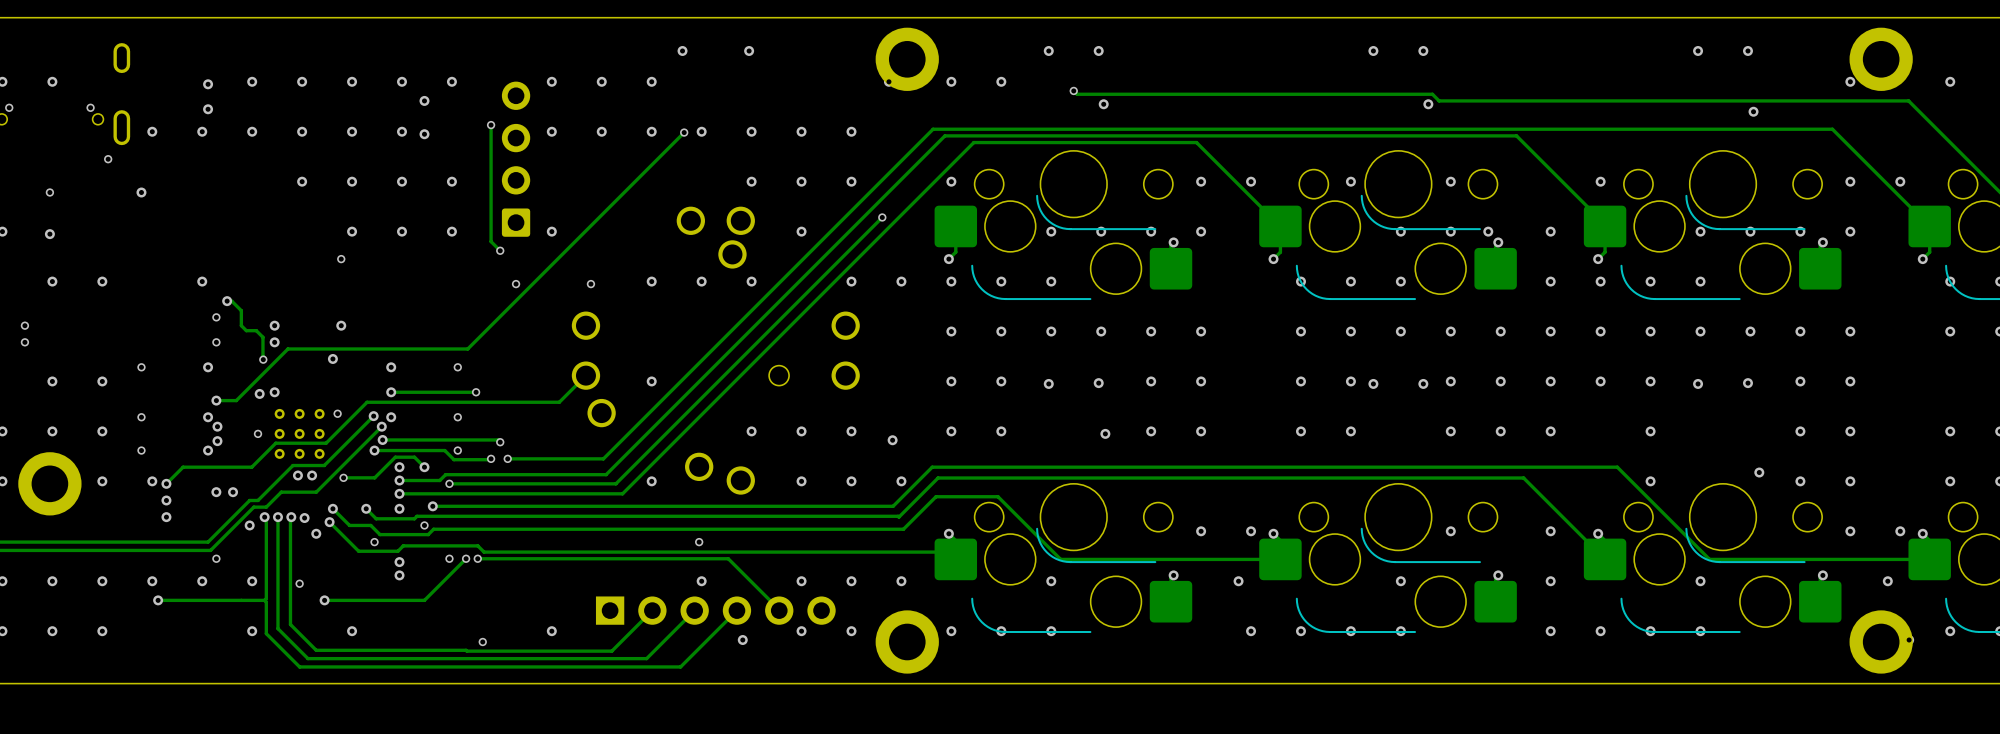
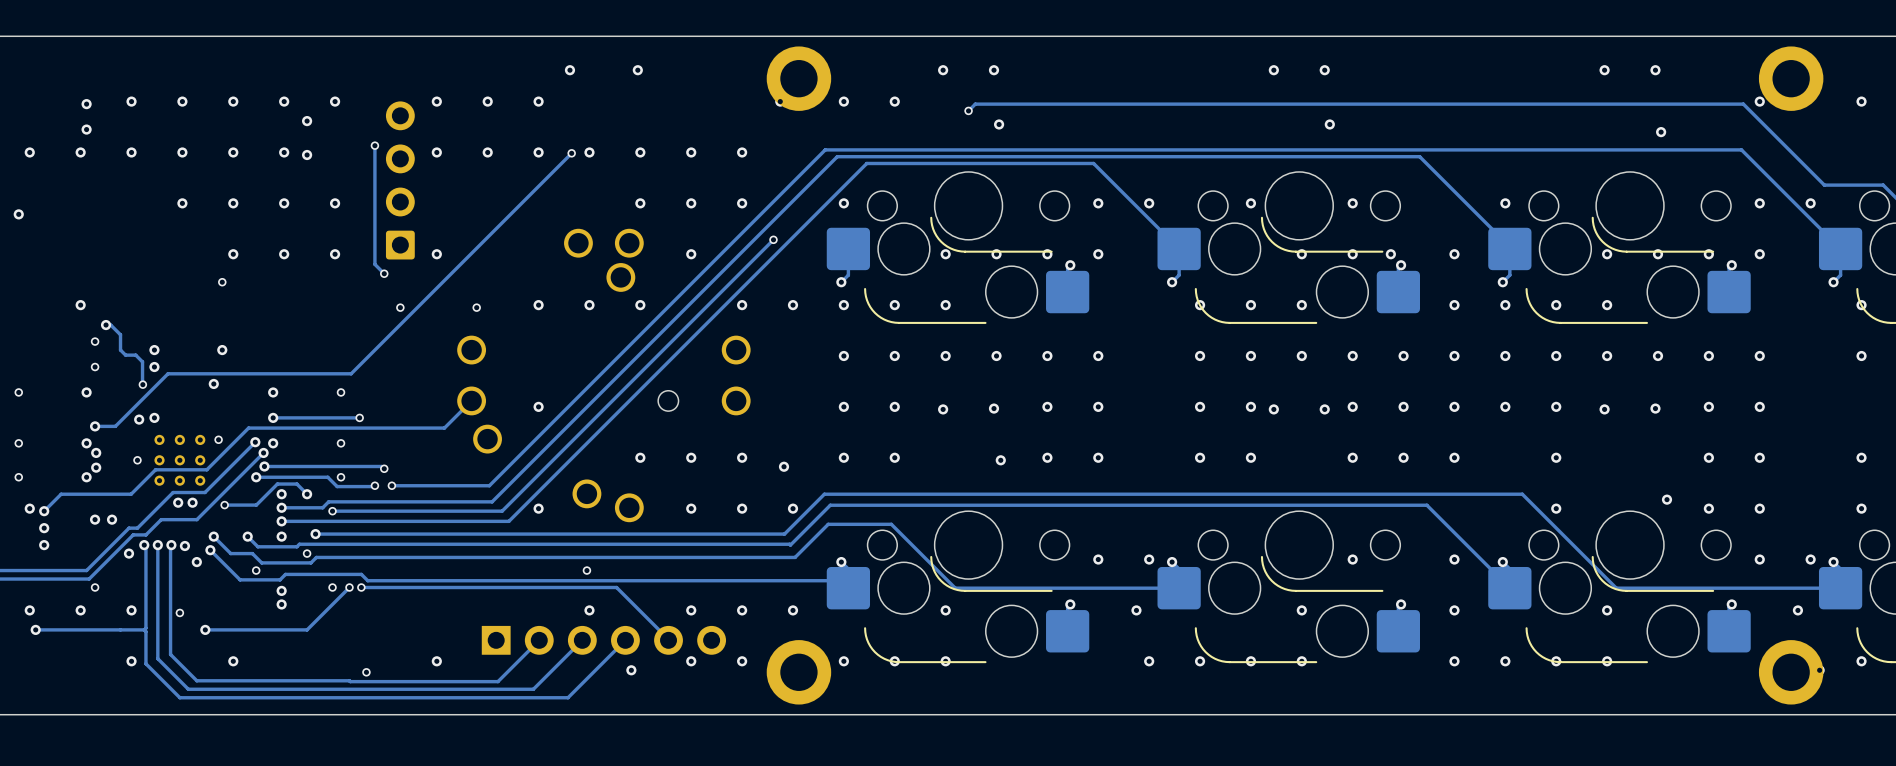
track: (1073, 90) (1077, 94) (1432, 94) (1439, 100) (1908, 100) (1971, 163) -> (968, 110) (975, 104) (1743, 104) (1824, 185) (1883, 185)

